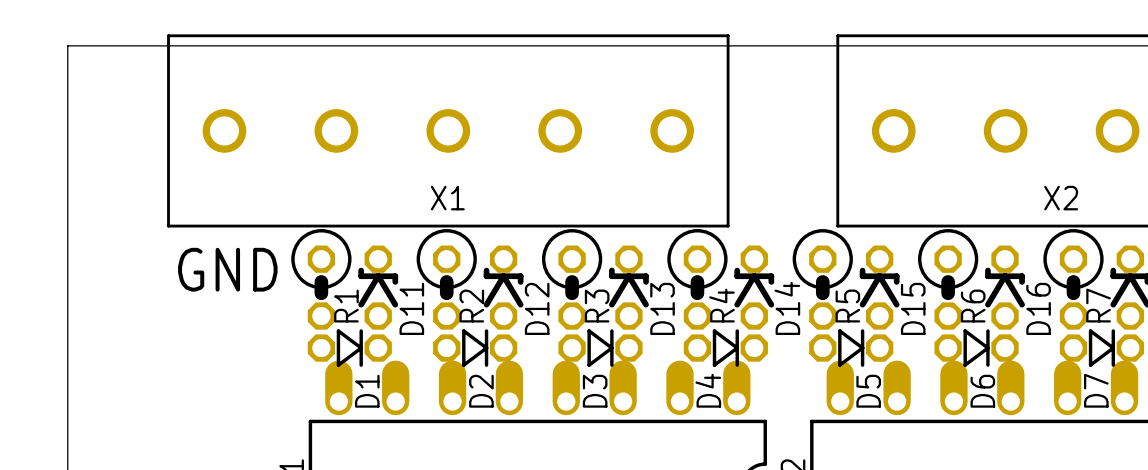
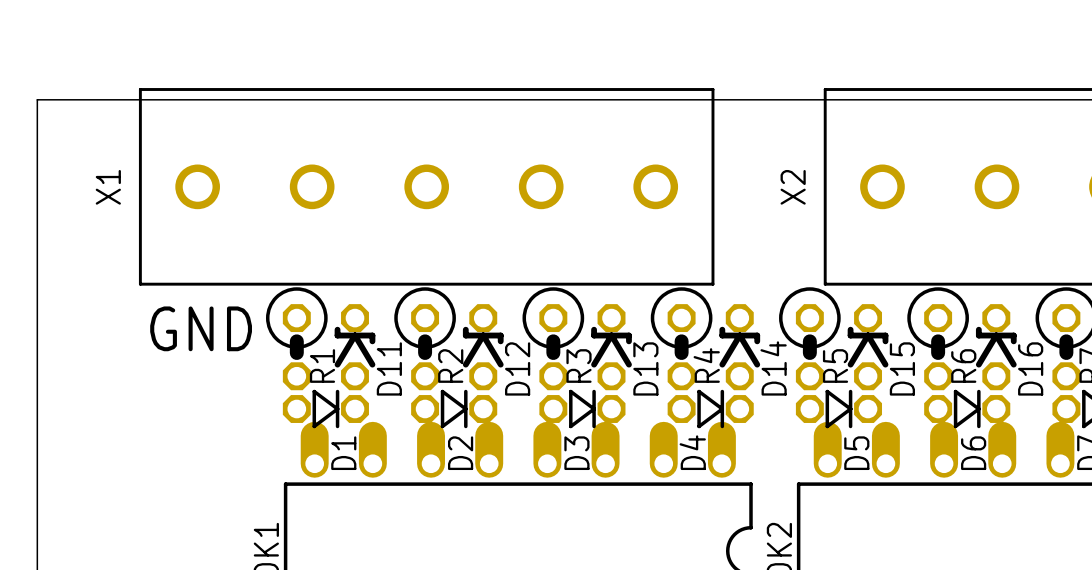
X1 name rotation: 0° (447, 198) -> 90° counterclockwise (108, 187)
X1 name position: X1 (447, 198) -> X1 (108, 187)
X2 name rotation: 0° (1061, 198) -> 90° counterclockwise (793, 187)
X2 name position: X2 (1061, 198) -> X2 (793, 187)

